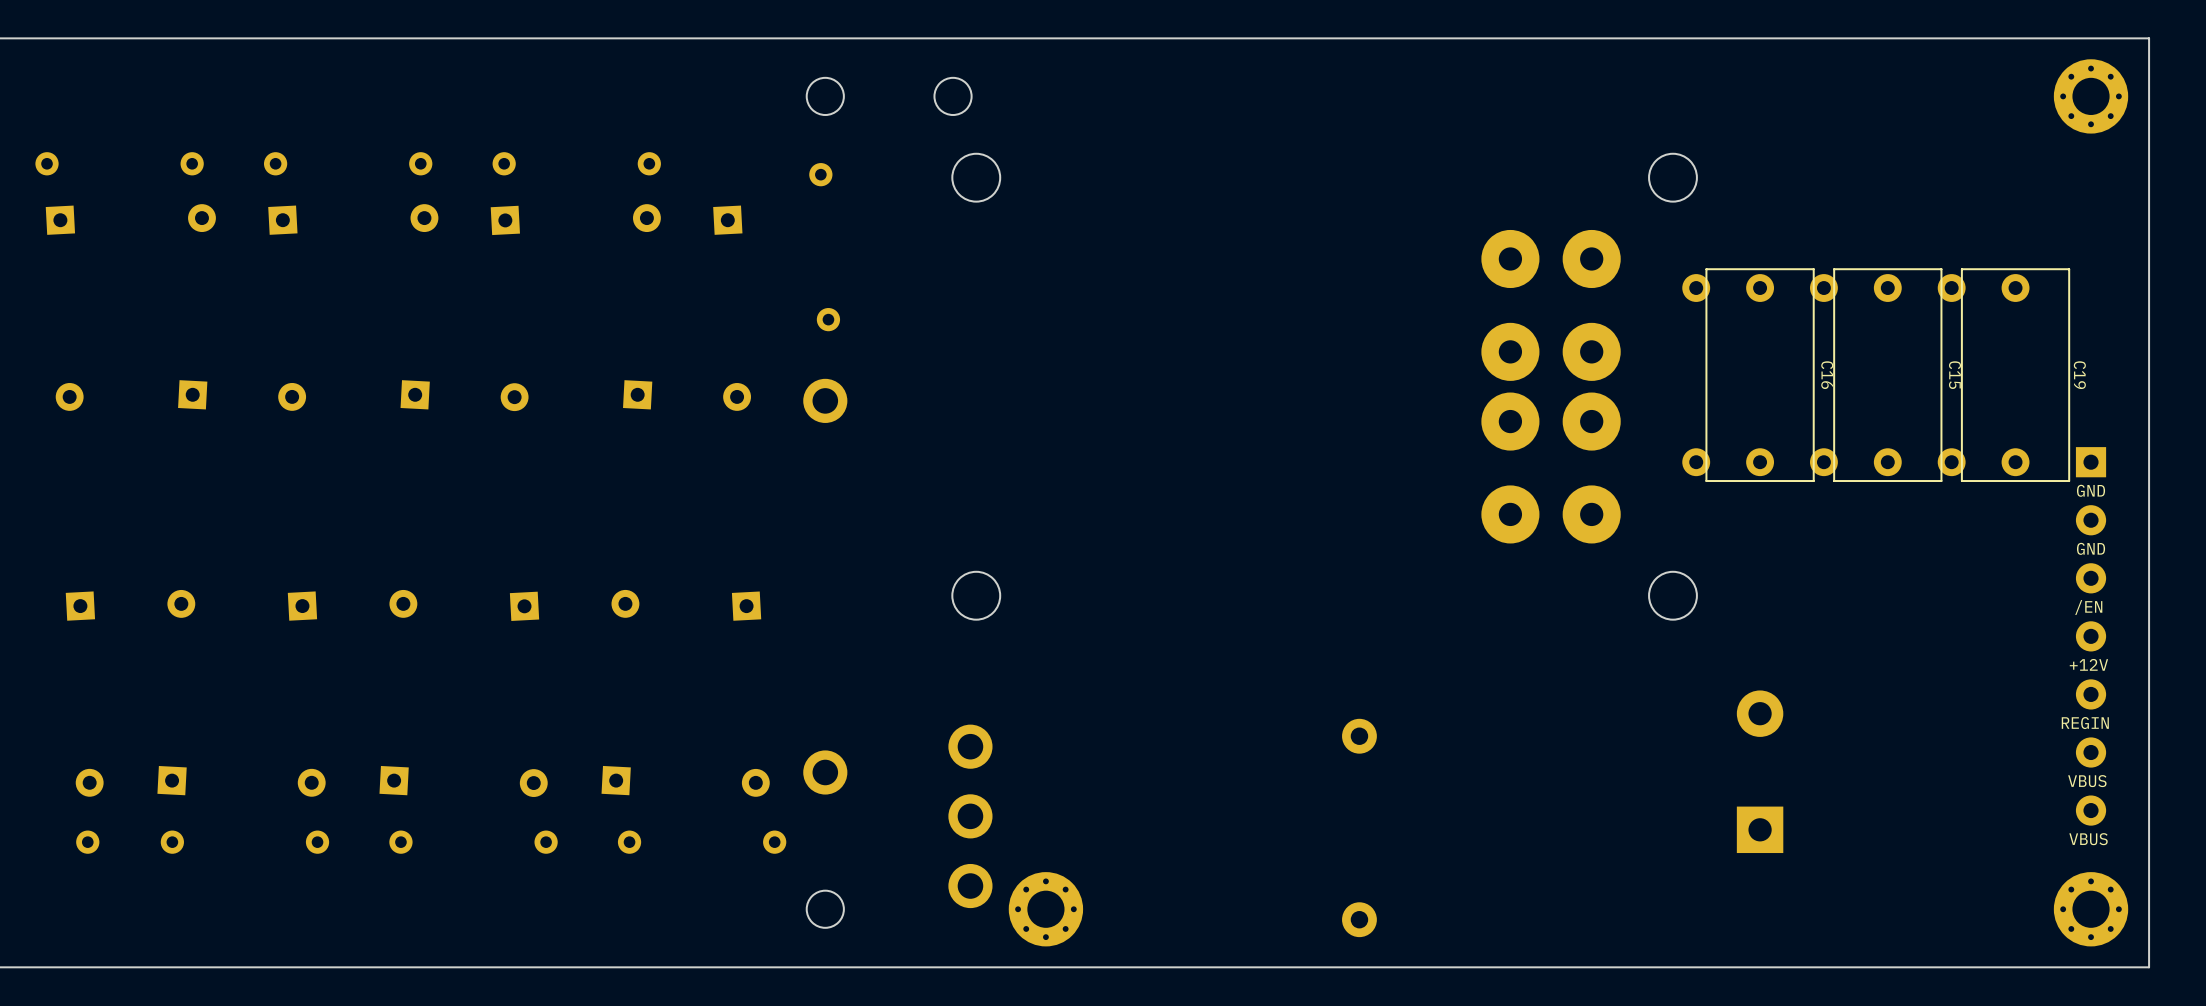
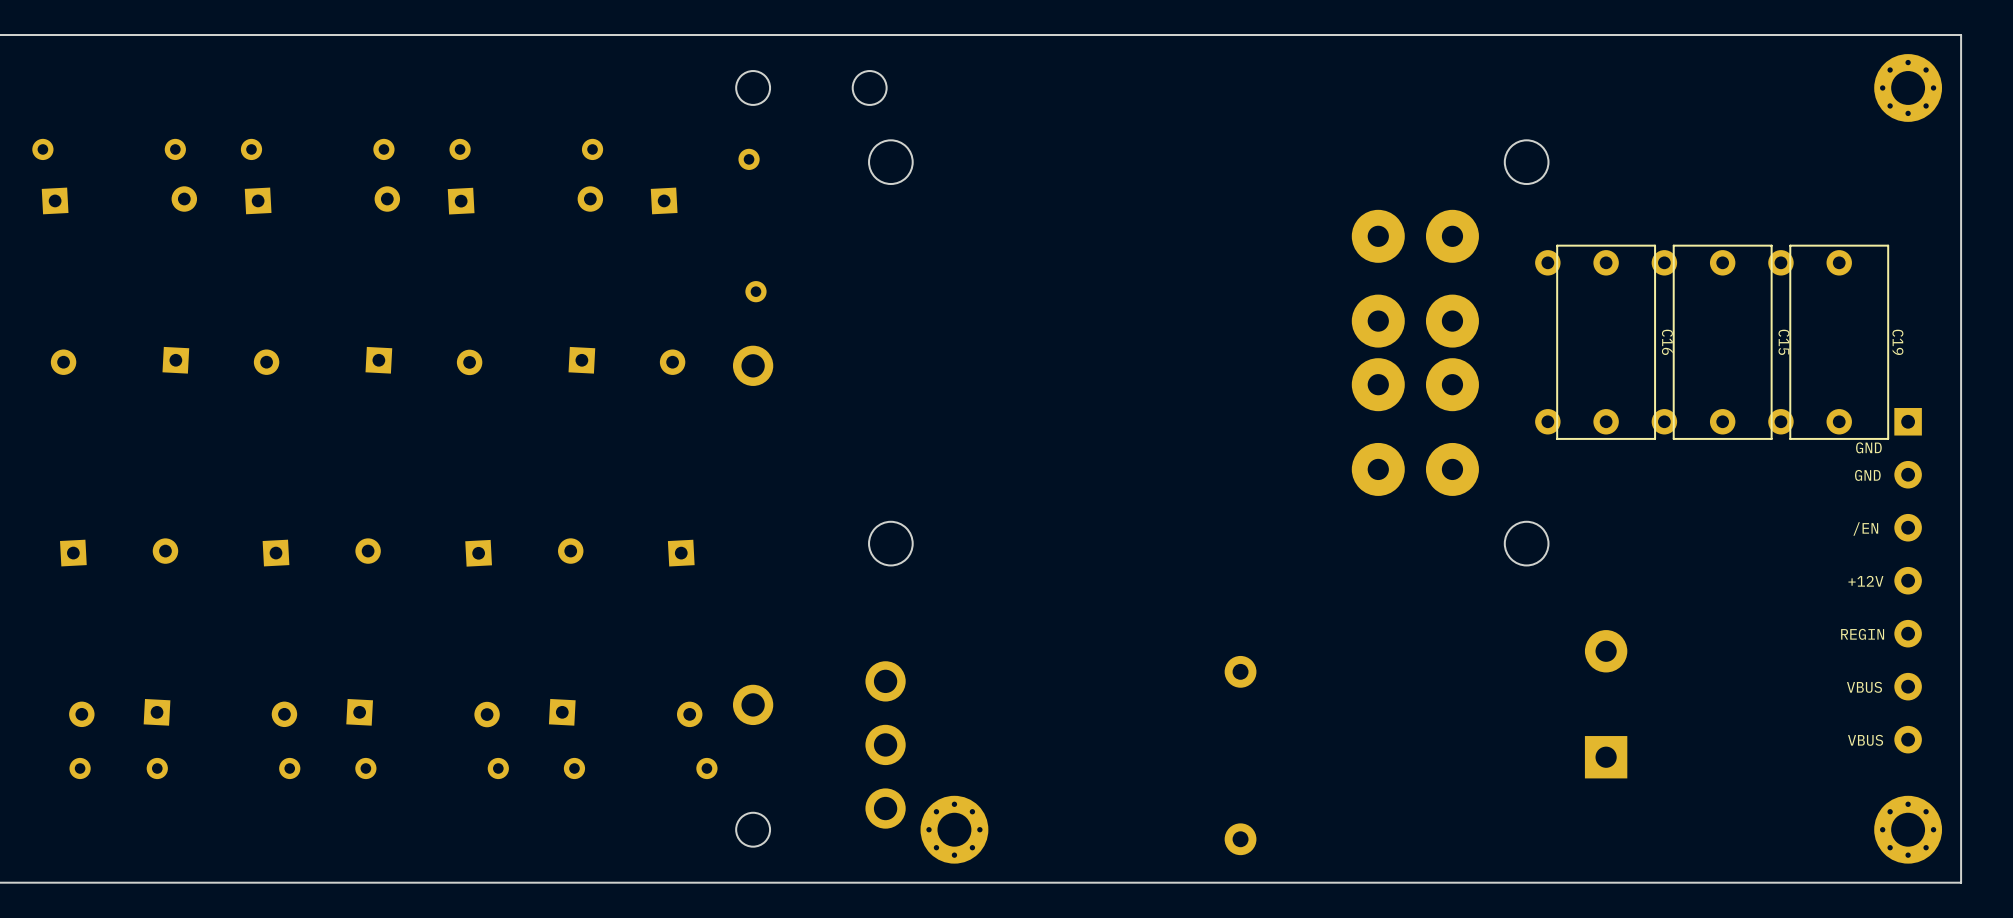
text position: GND (2091, 490) -> GND (1868, 447)
text: none -> GND (1867, 475)
text: GND (2091, 548) -> none
text position: /EN (2088, 607) -> /EN (1865, 528)
text position: +12V (2088, 664) -> +12V (1865, 581)
text position: REGIN (2085, 723) -> REGIN (1862, 634)
text: none -> VBUS (1864, 687)
text: VBUS (2087, 781) -> none
text: none -> VBUS (1865, 740)
text: VBUS (2088, 839) -> none

